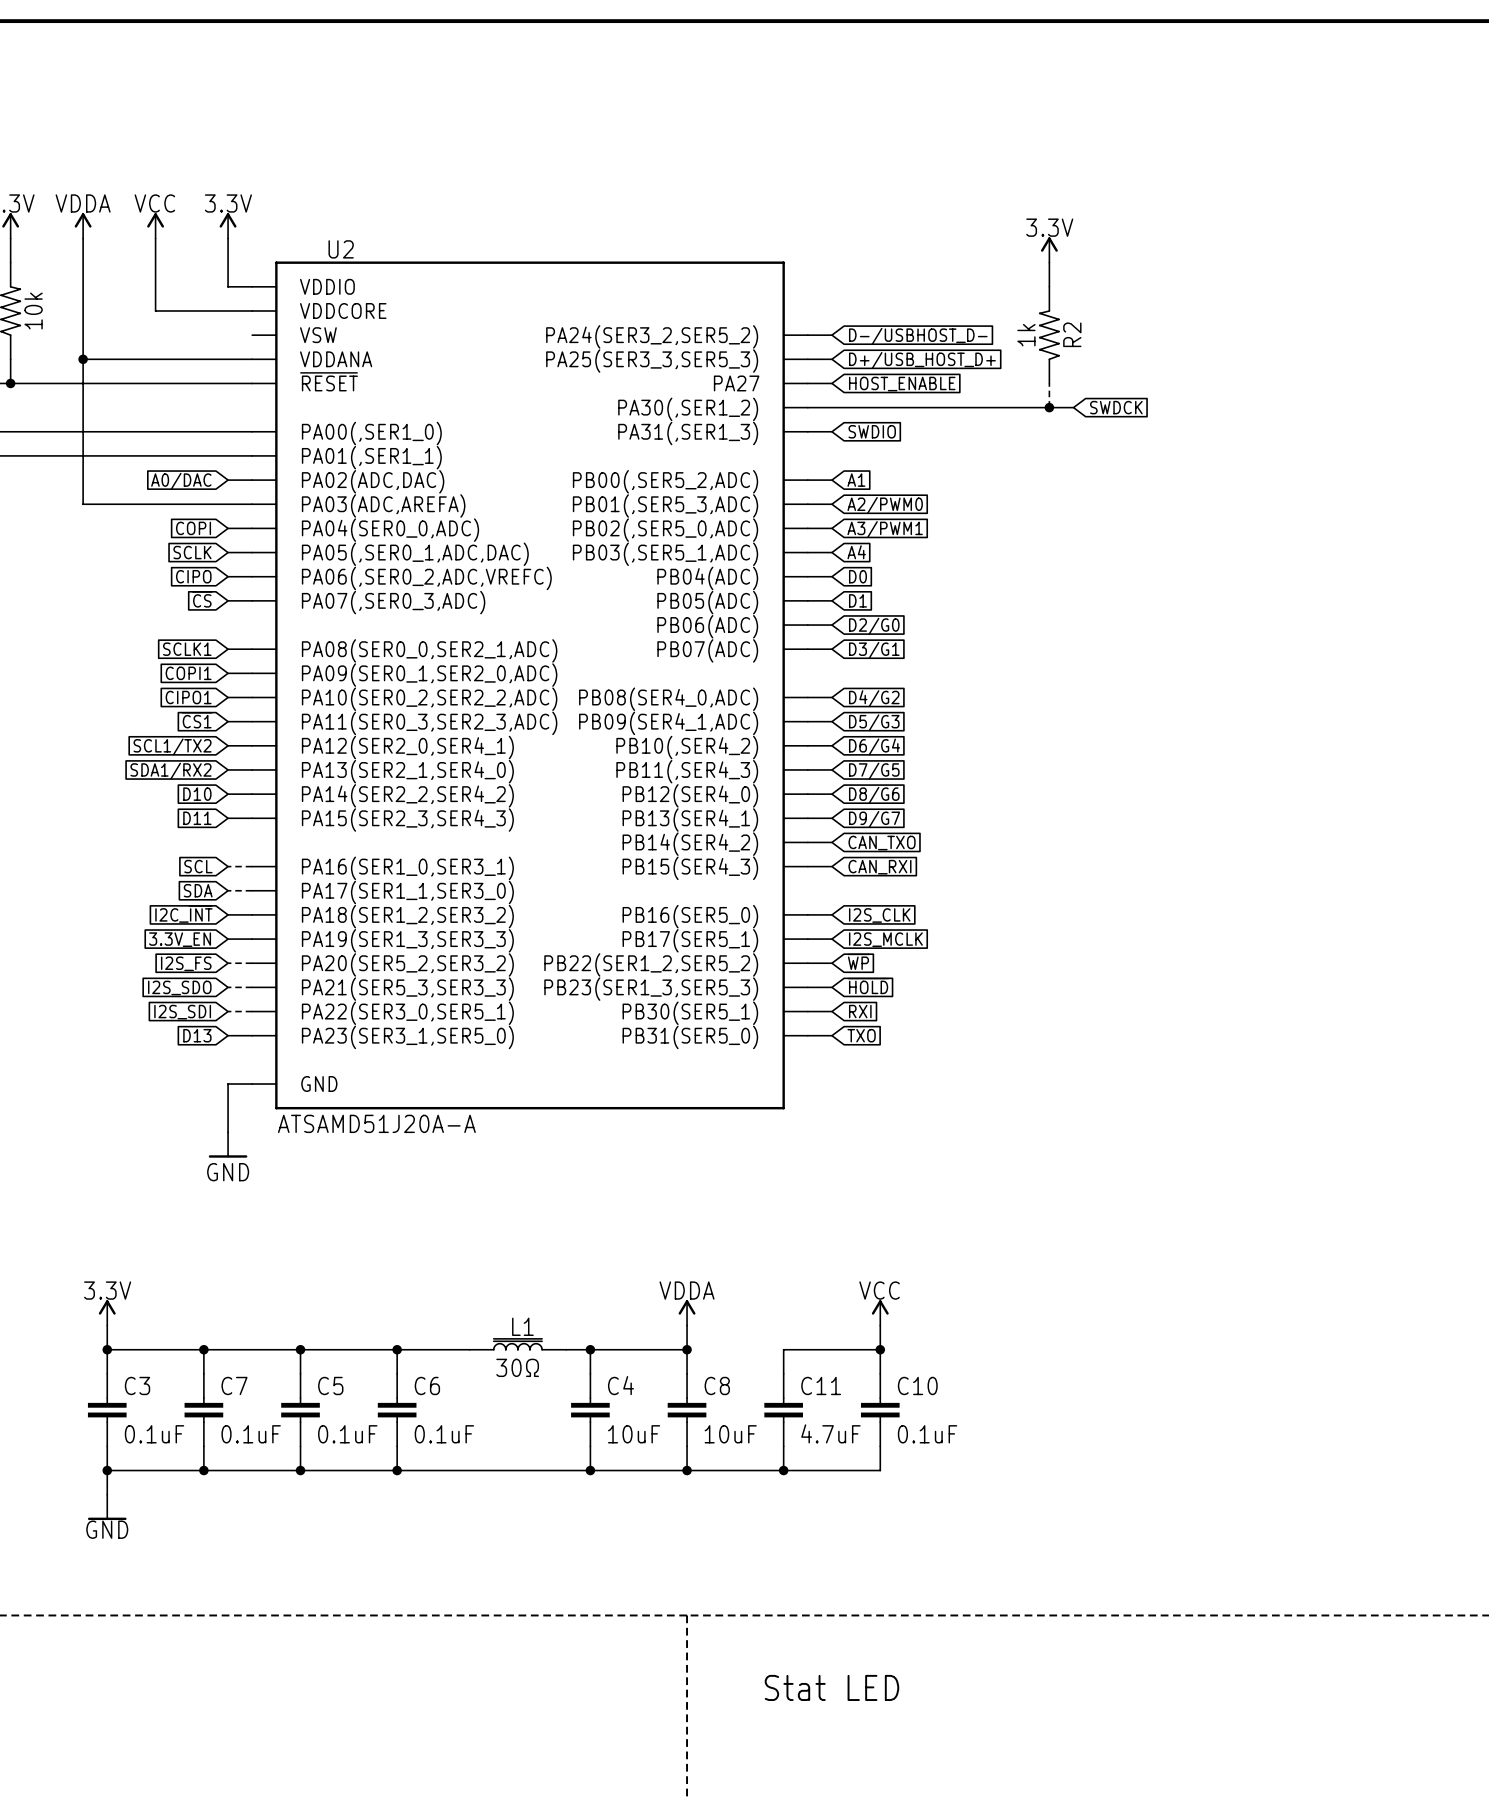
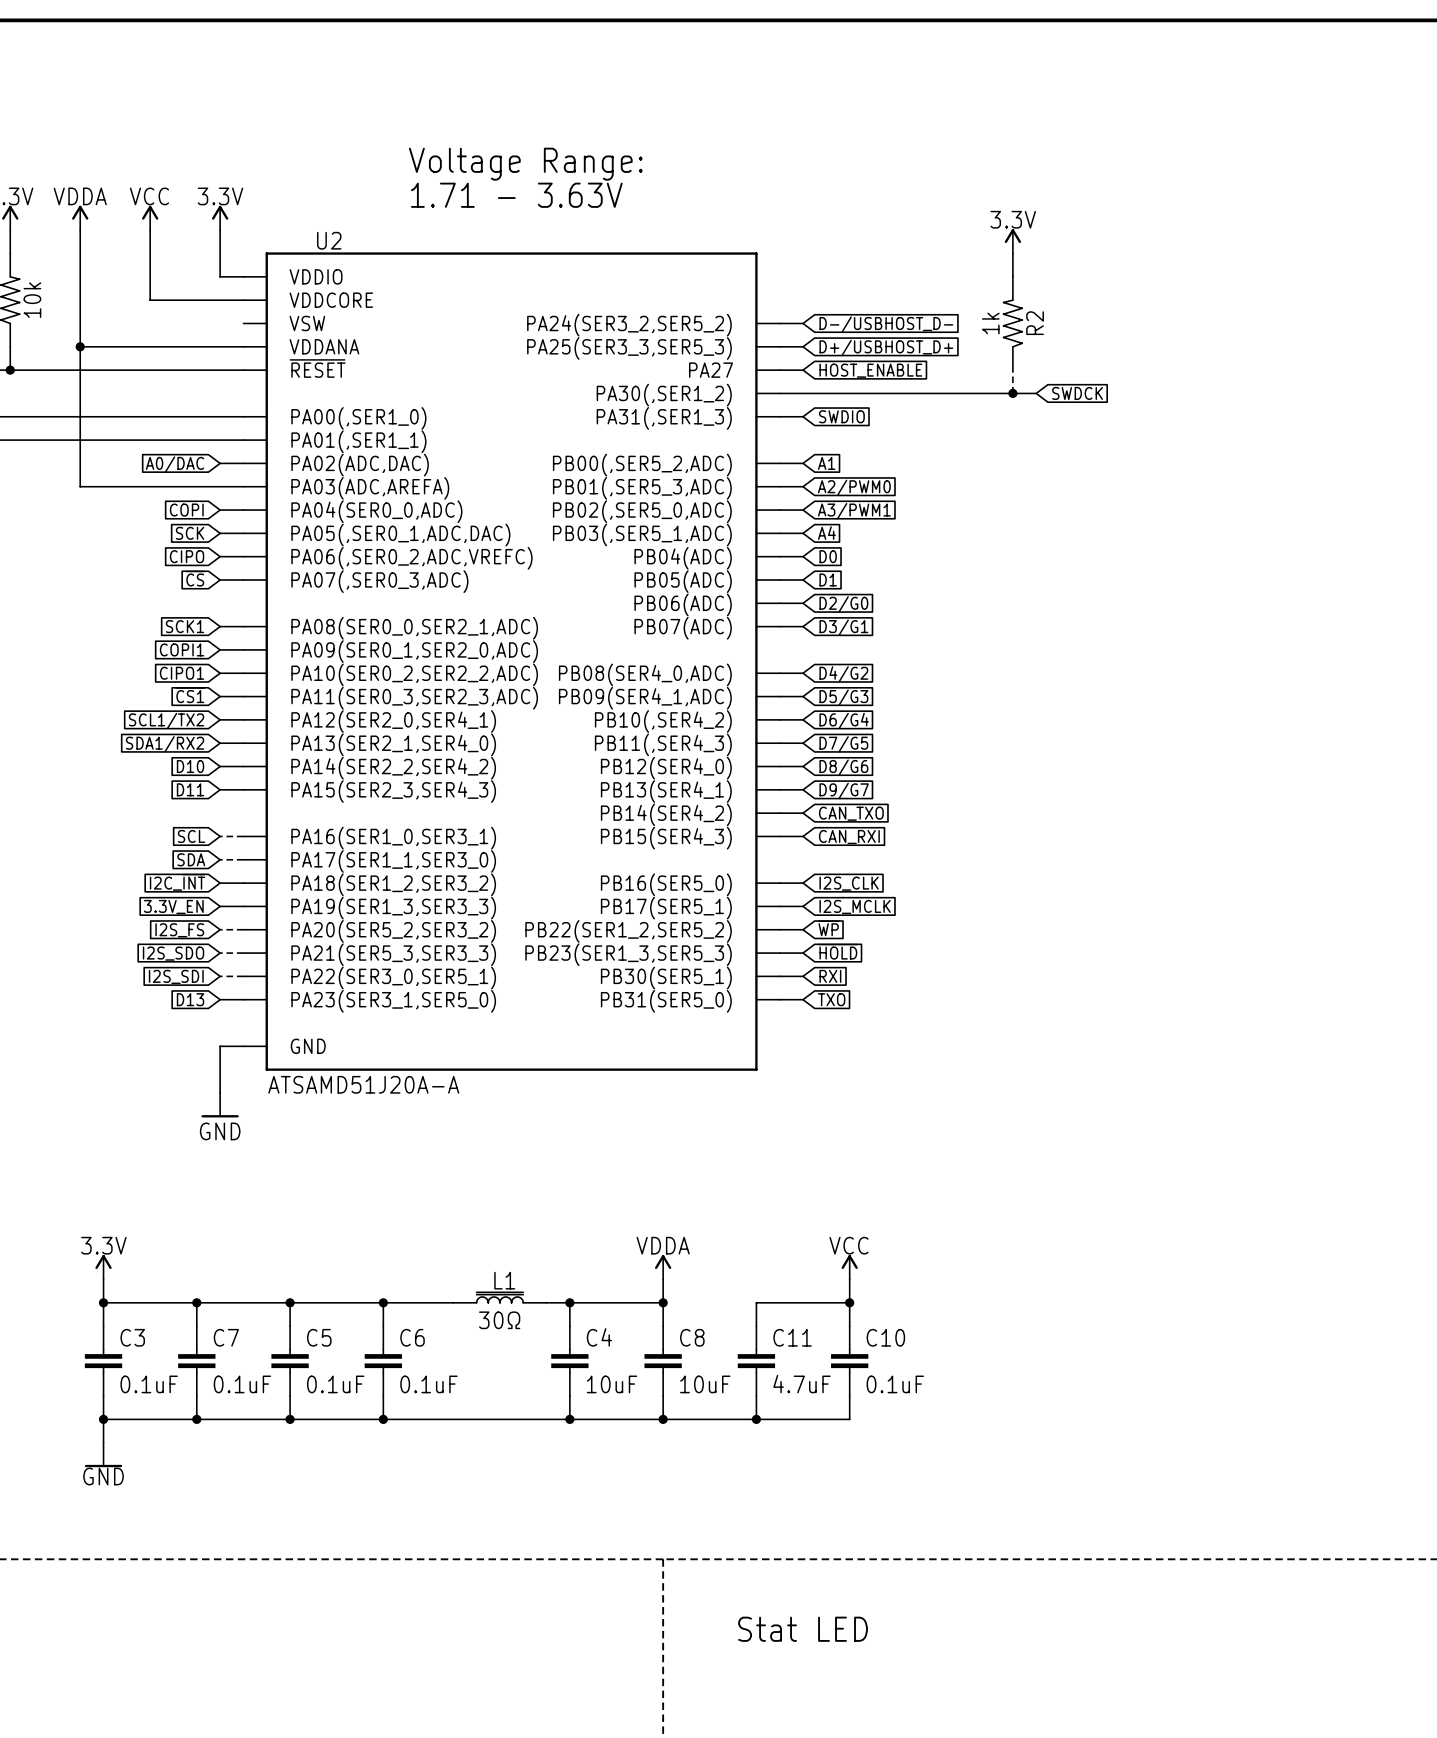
text: none -> Voltage Range: (525, 164)
text: none -> 1.71 - 3.63V (516, 195)
global label: D+/USB_HOST_D+ (922, 360) -> D+/USBHOST_D+ (886, 347)
global label: SCLK (192, 552) -> SCK (190, 533)
global label: SCLK1 (187, 649) -> SCK1 (185, 626)

